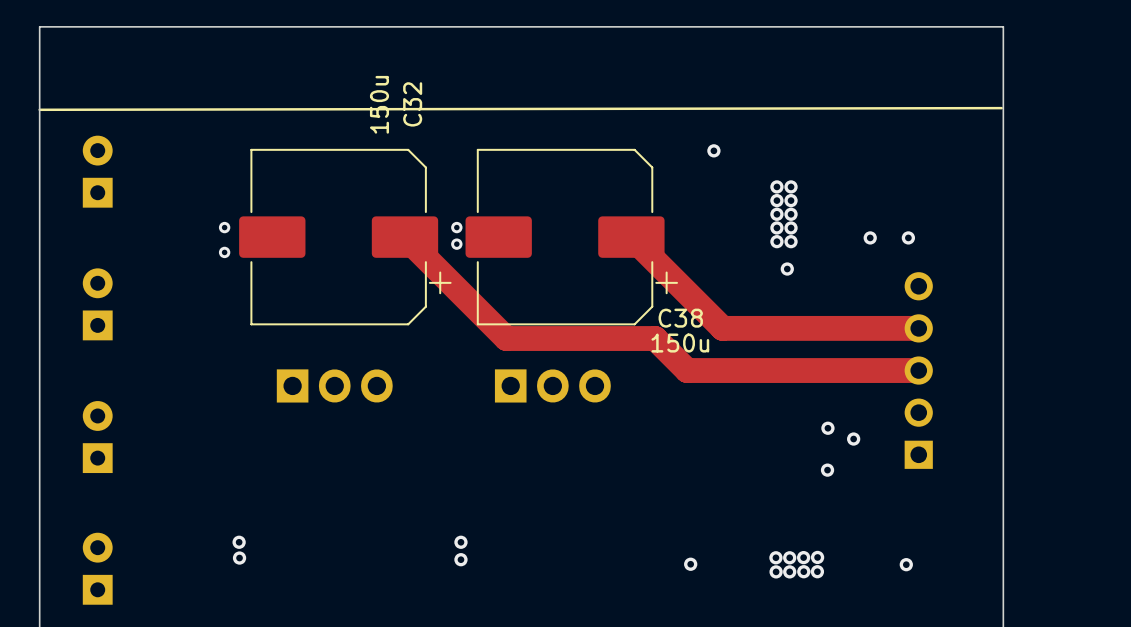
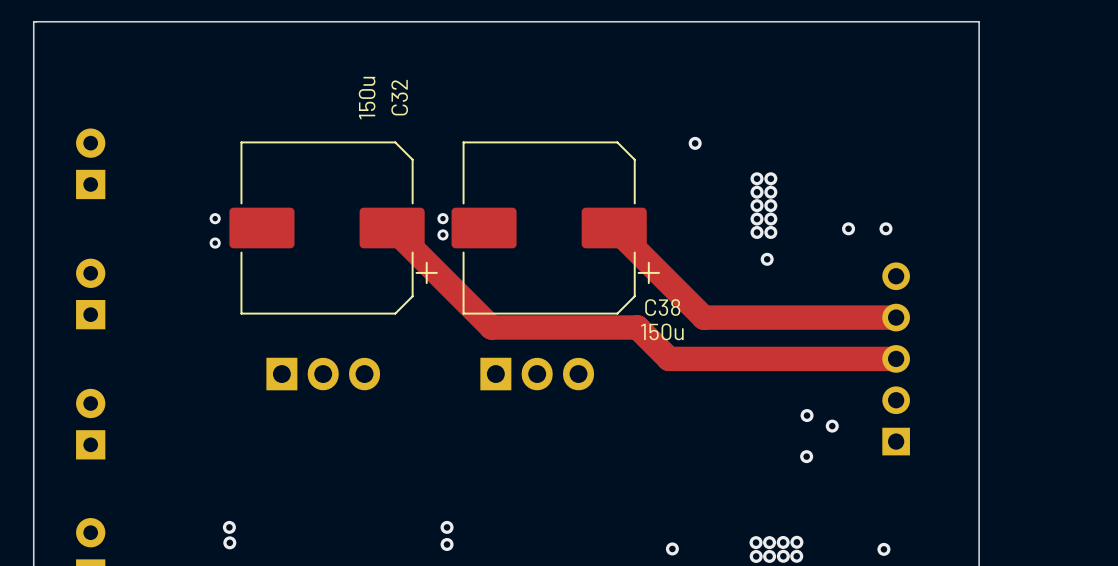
line: (1001, 108) (39, 109) -> none

